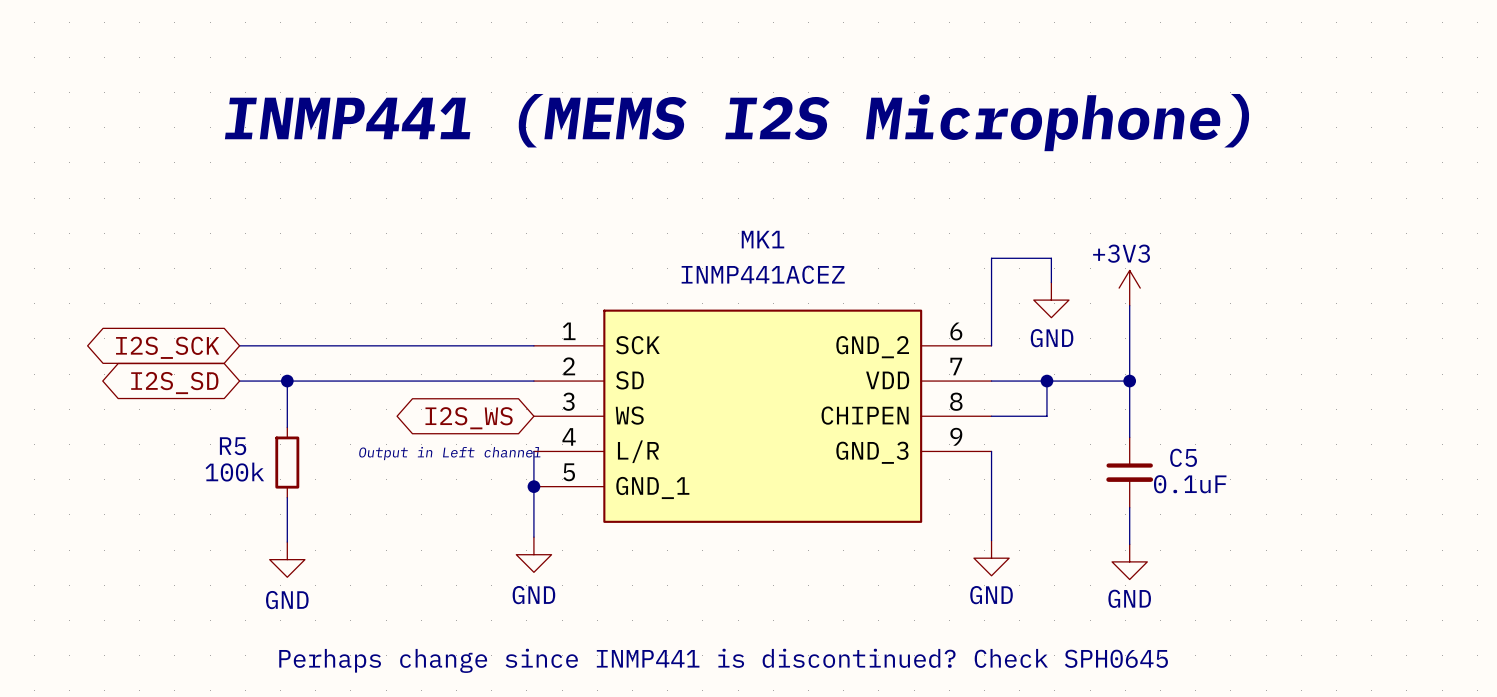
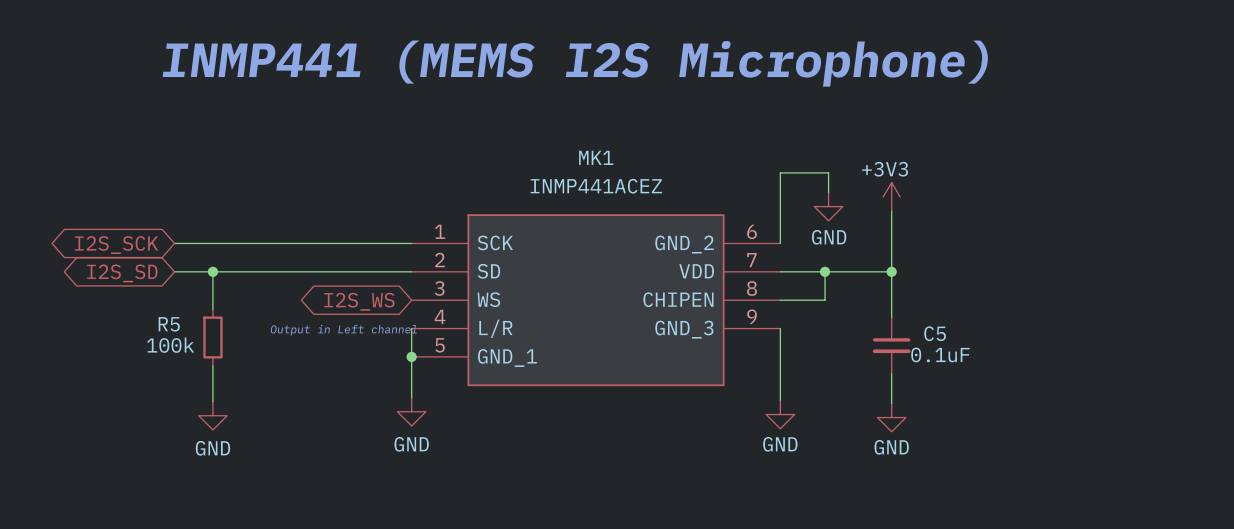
text: Perhaps change since INMP441 is discontinued? Check SPH0645 (723, 660) -> none

